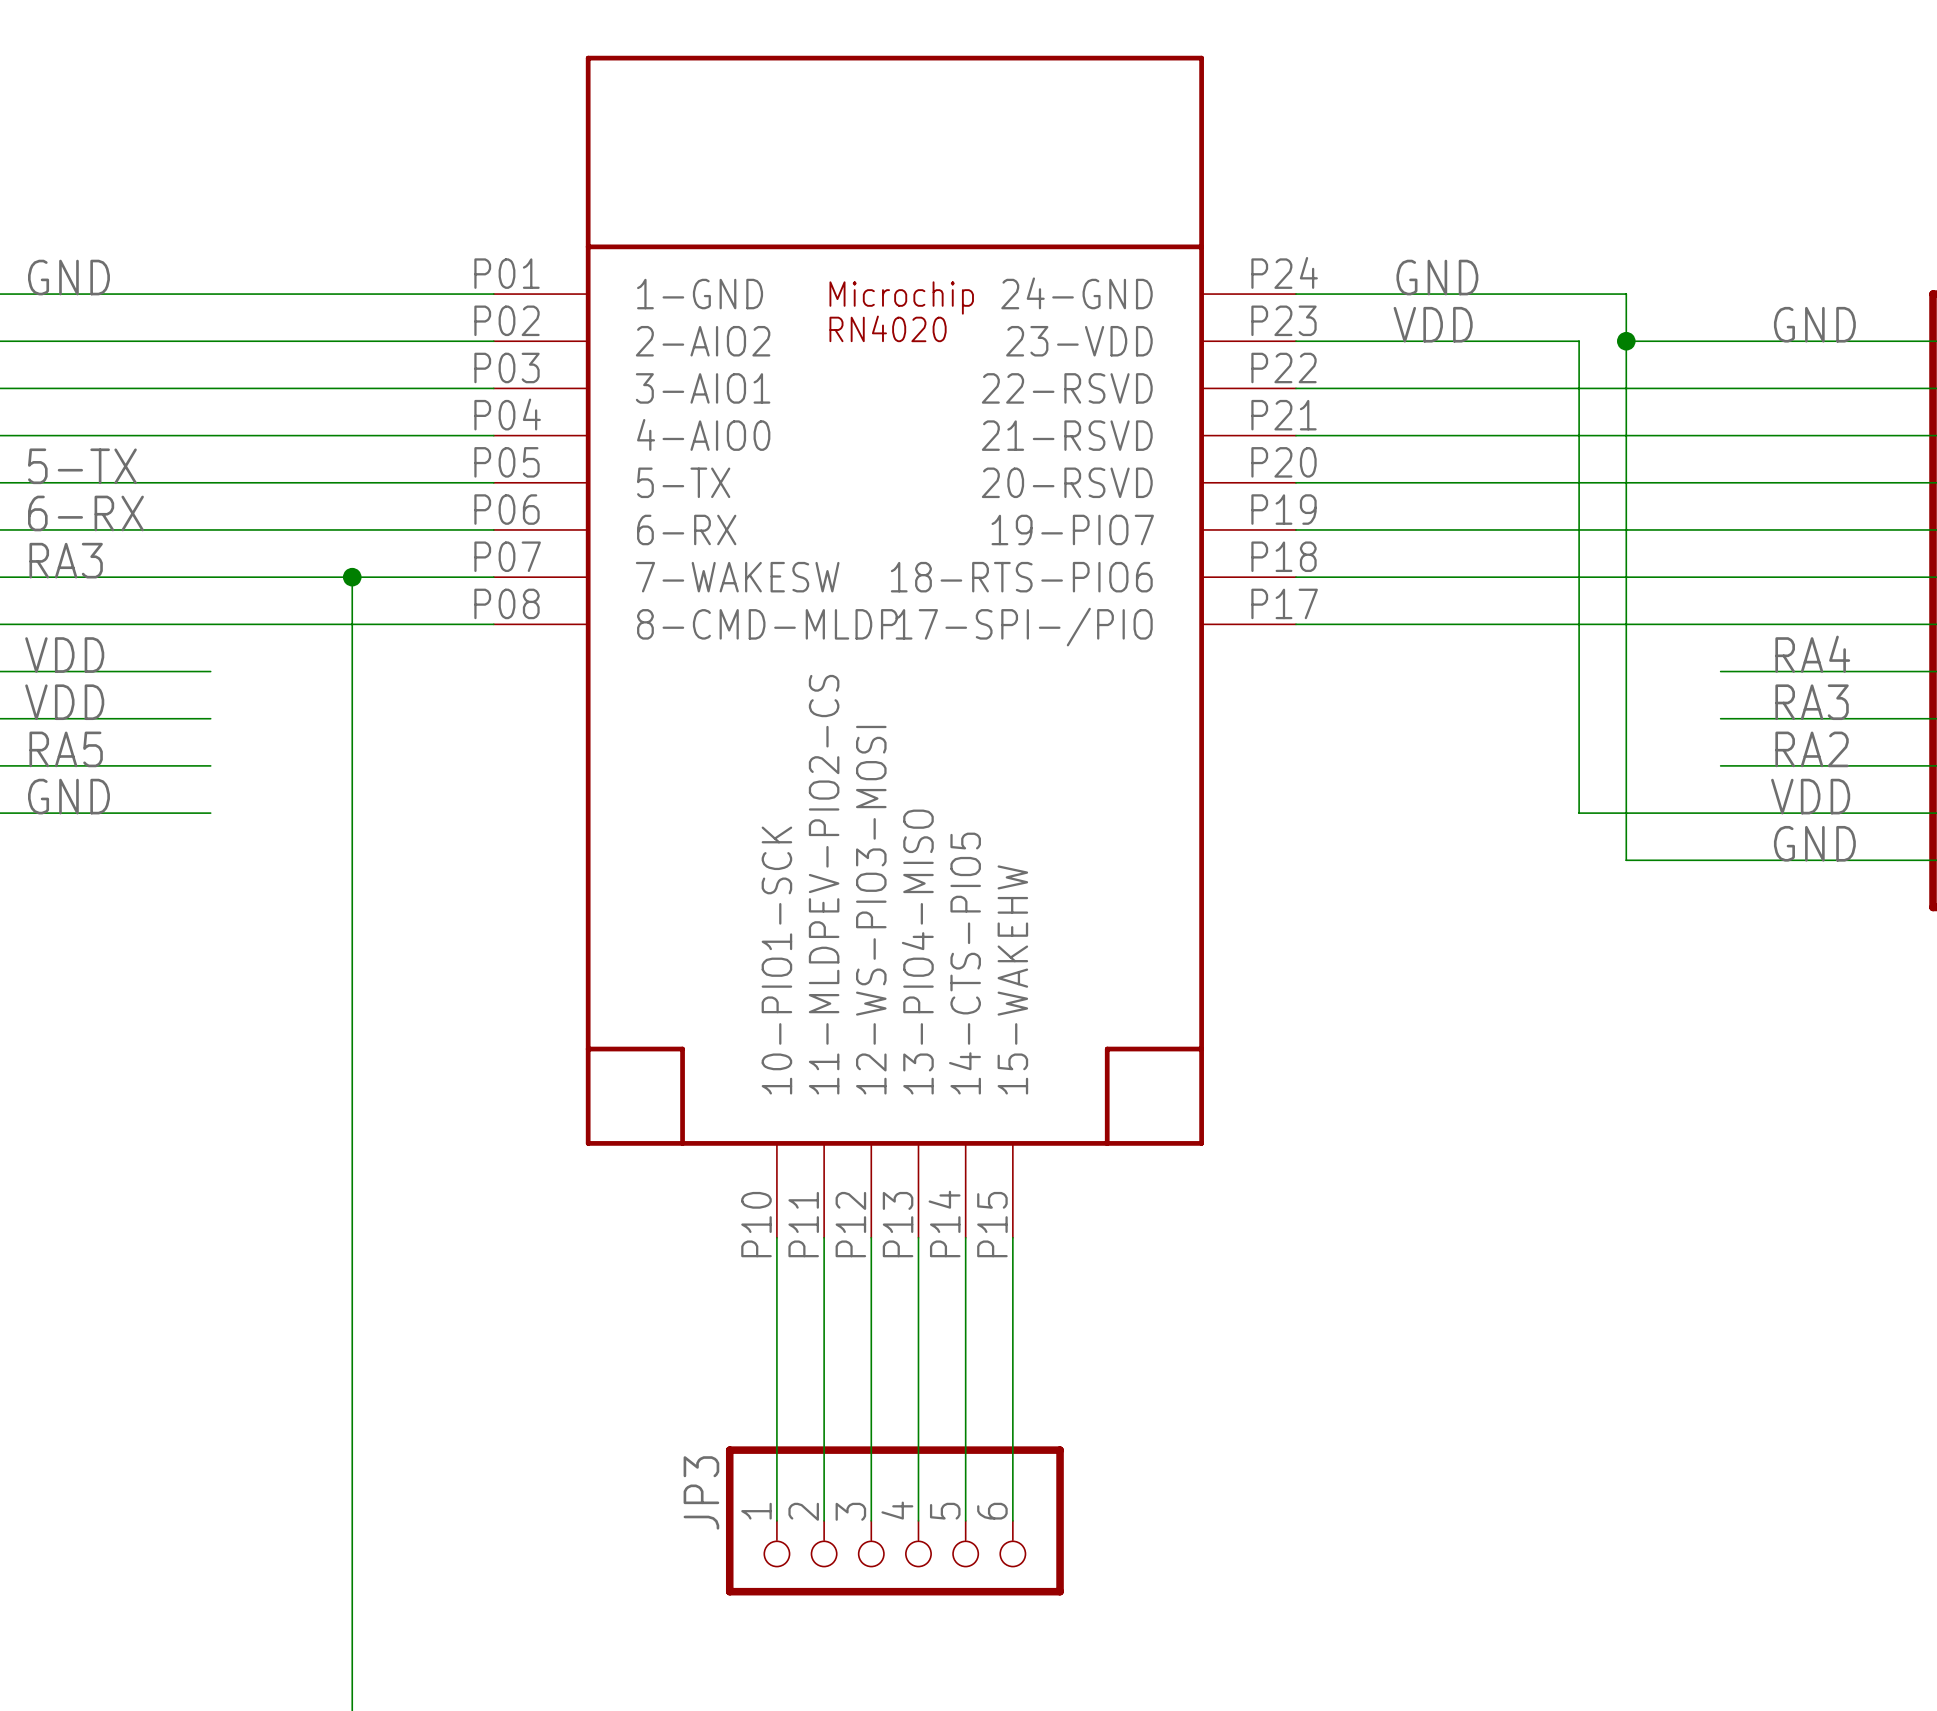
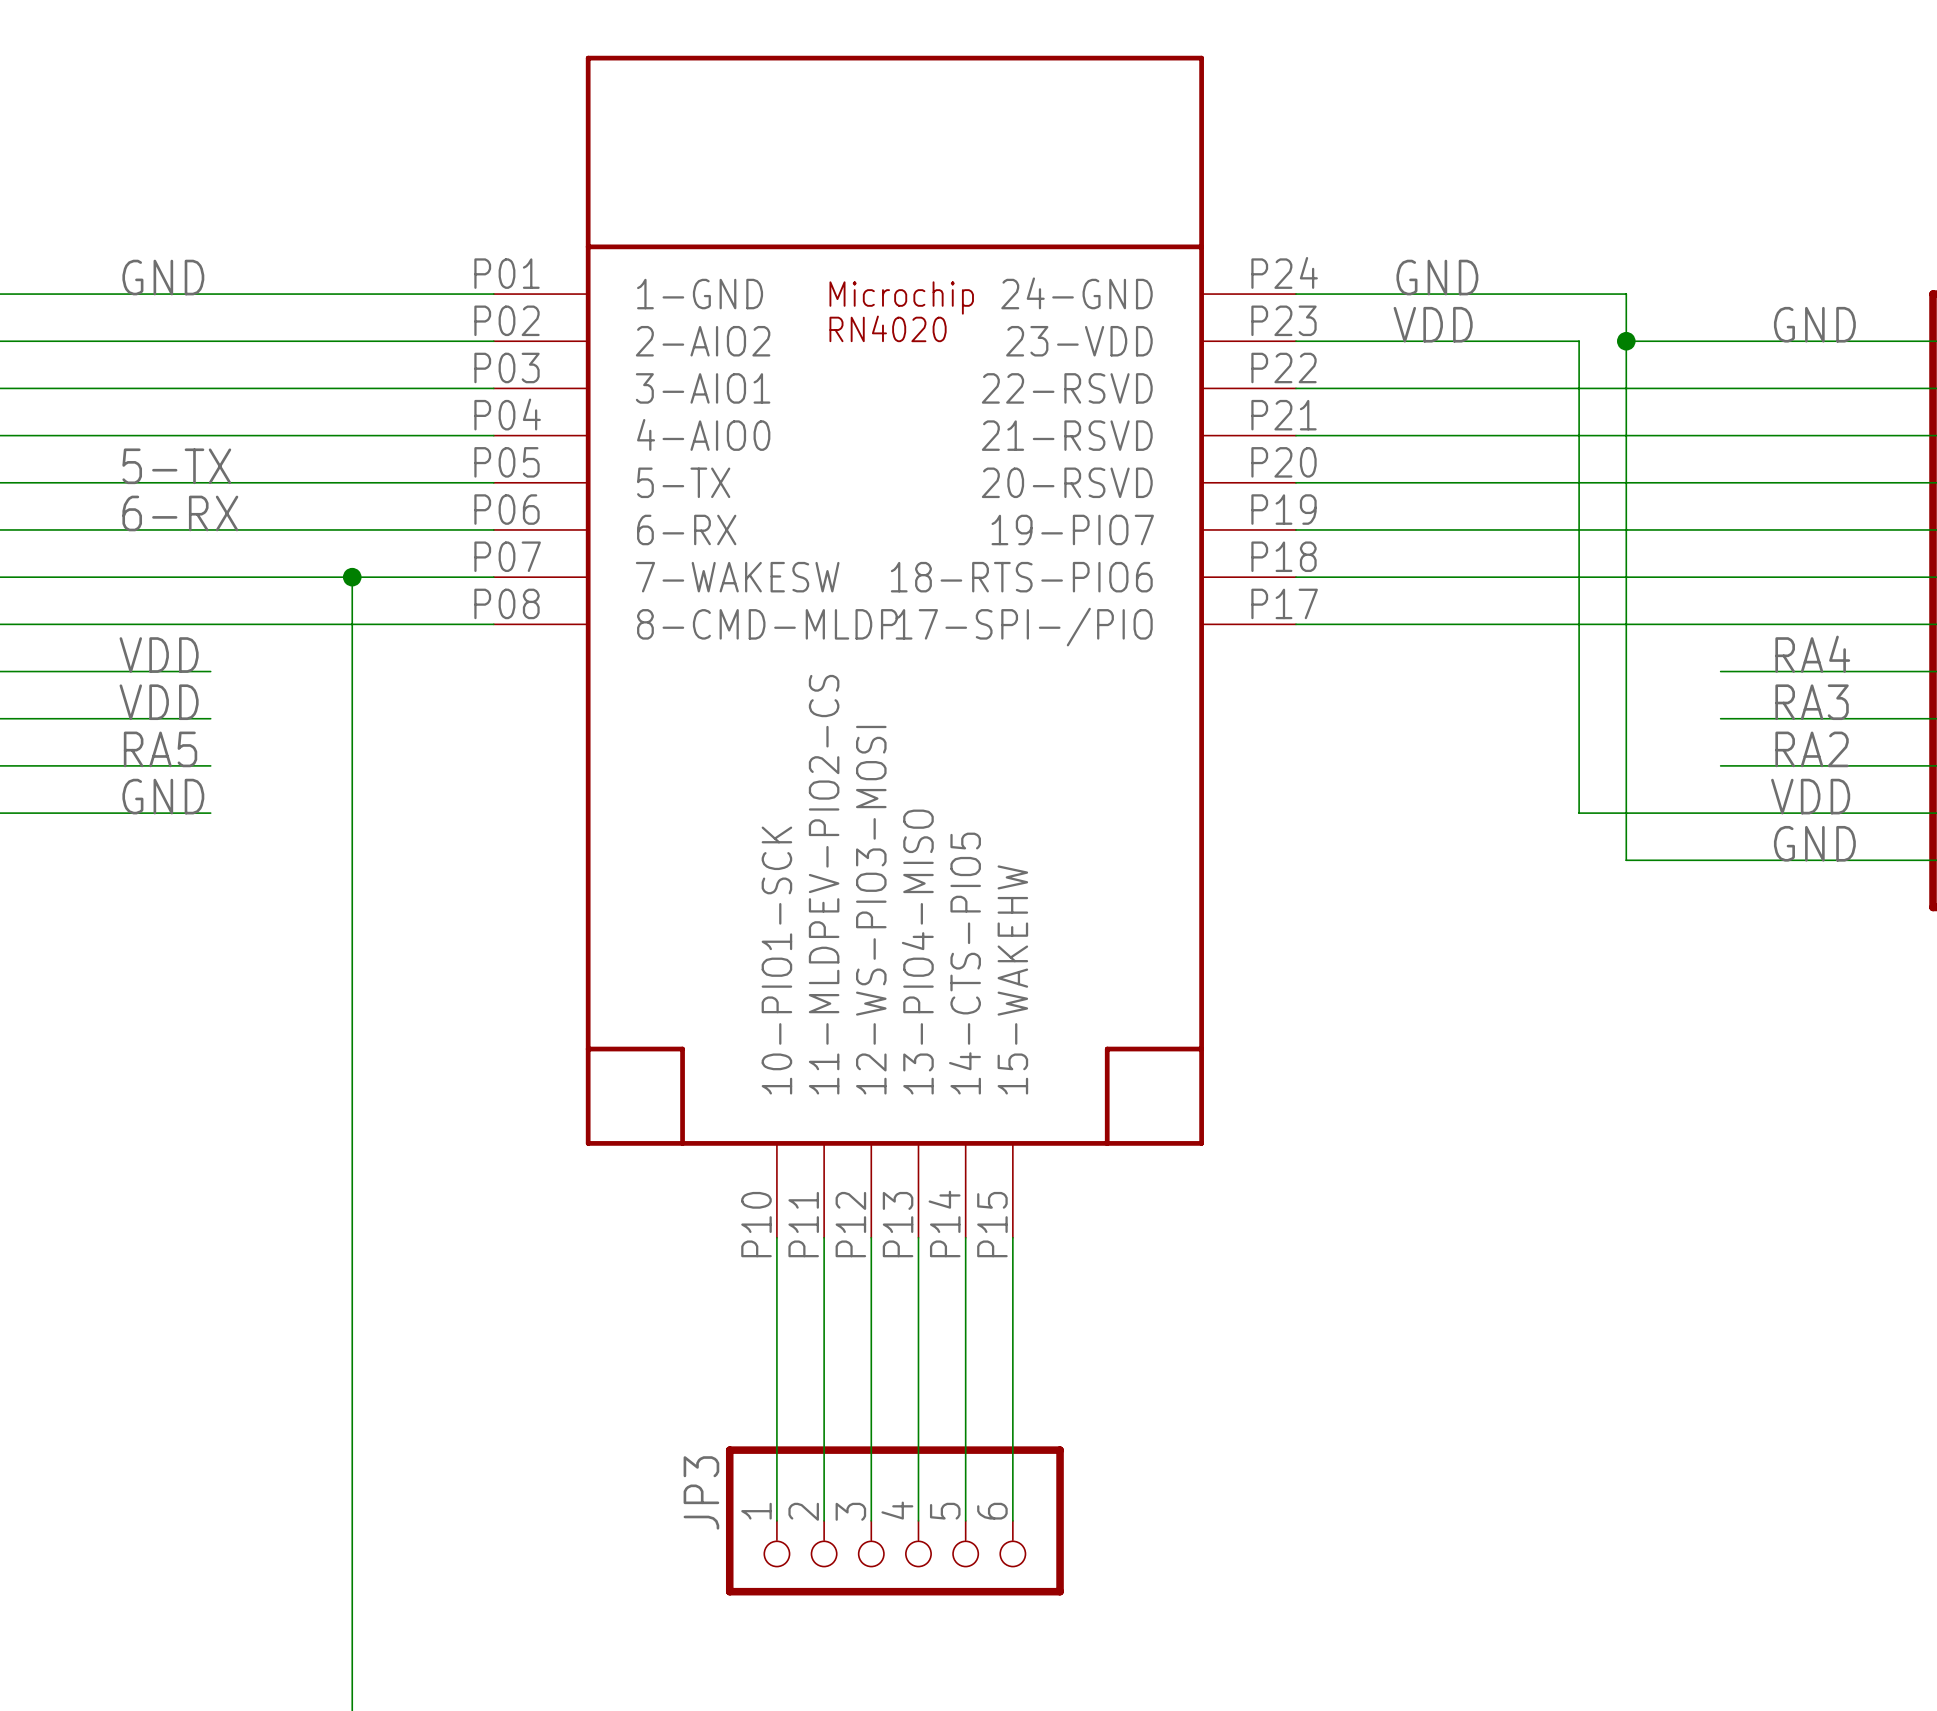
label position: GND (68, 277) -> GND (163, 277)
label position: 5-TX (82, 466) -> 5-TX (176, 466)
label position: 6-RX (85, 513) -> 6-RX (180, 513)
label: RA3 (66, 560) -> none
label: VDD (64, 655) -> none
label: none -> VDD (159, 655)
label: VDD (64, 702) -> none
label: none -> VDD (159, 702)
label position: RA5 (66, 749) -> RA5 (160, 749)
label position: GND (68, 796) -> GND (163, 796)

